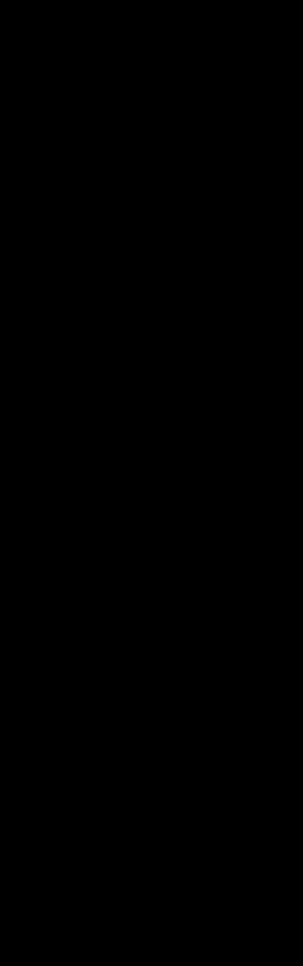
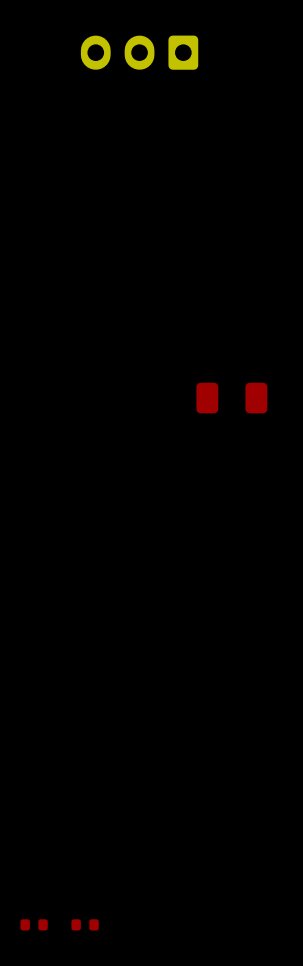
part: none -> (139, 52)
part: none -> (231, 398)
part: none -> (34, 924)
part: none -> (85, 924)

